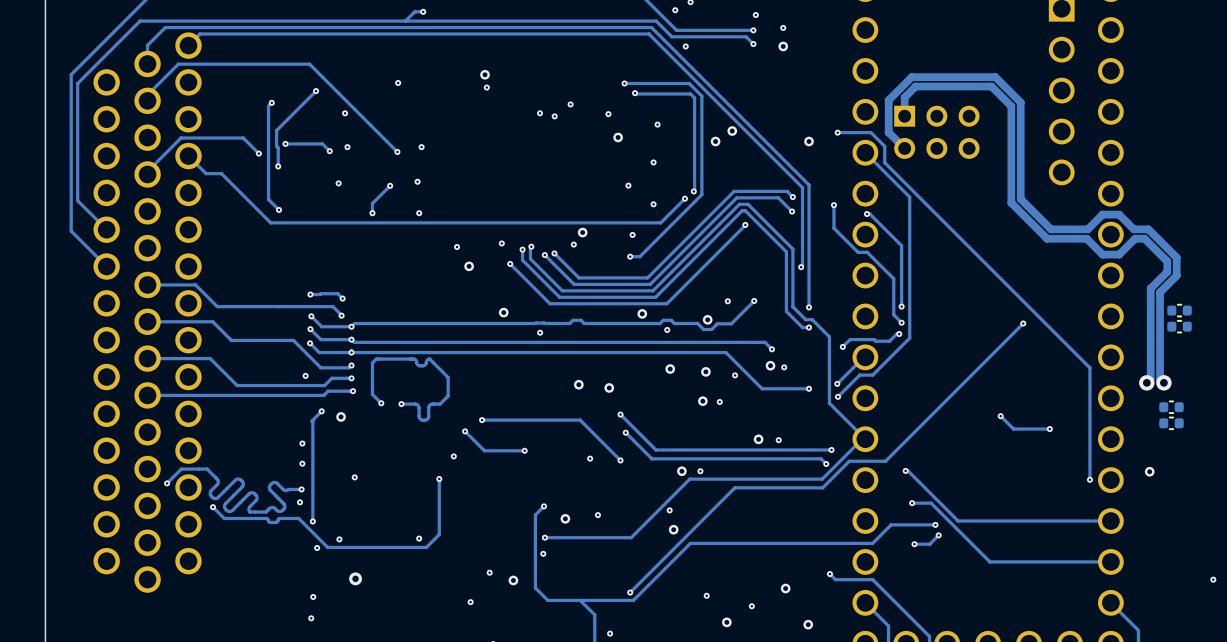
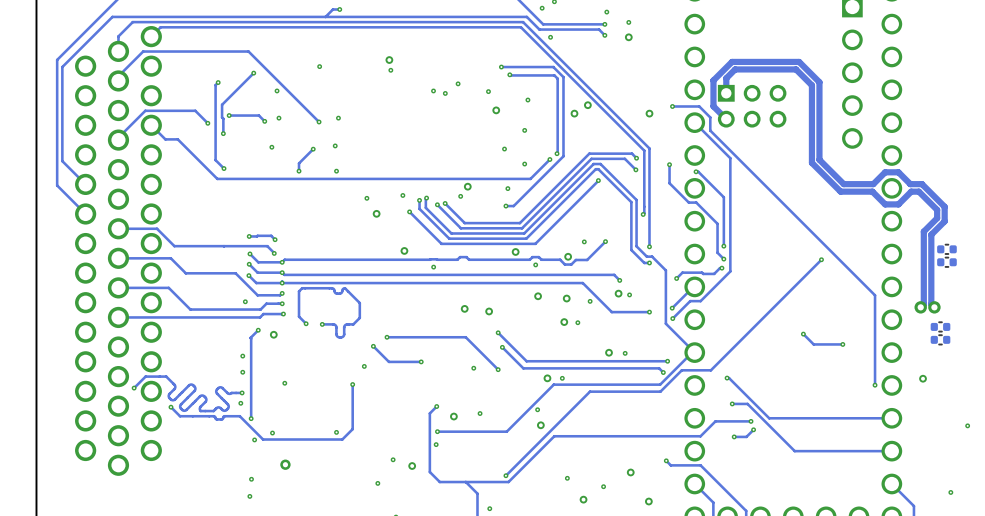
via: none -> (967, 425)
via: (1213, 579) -> none
via: none -> (950, 492)

